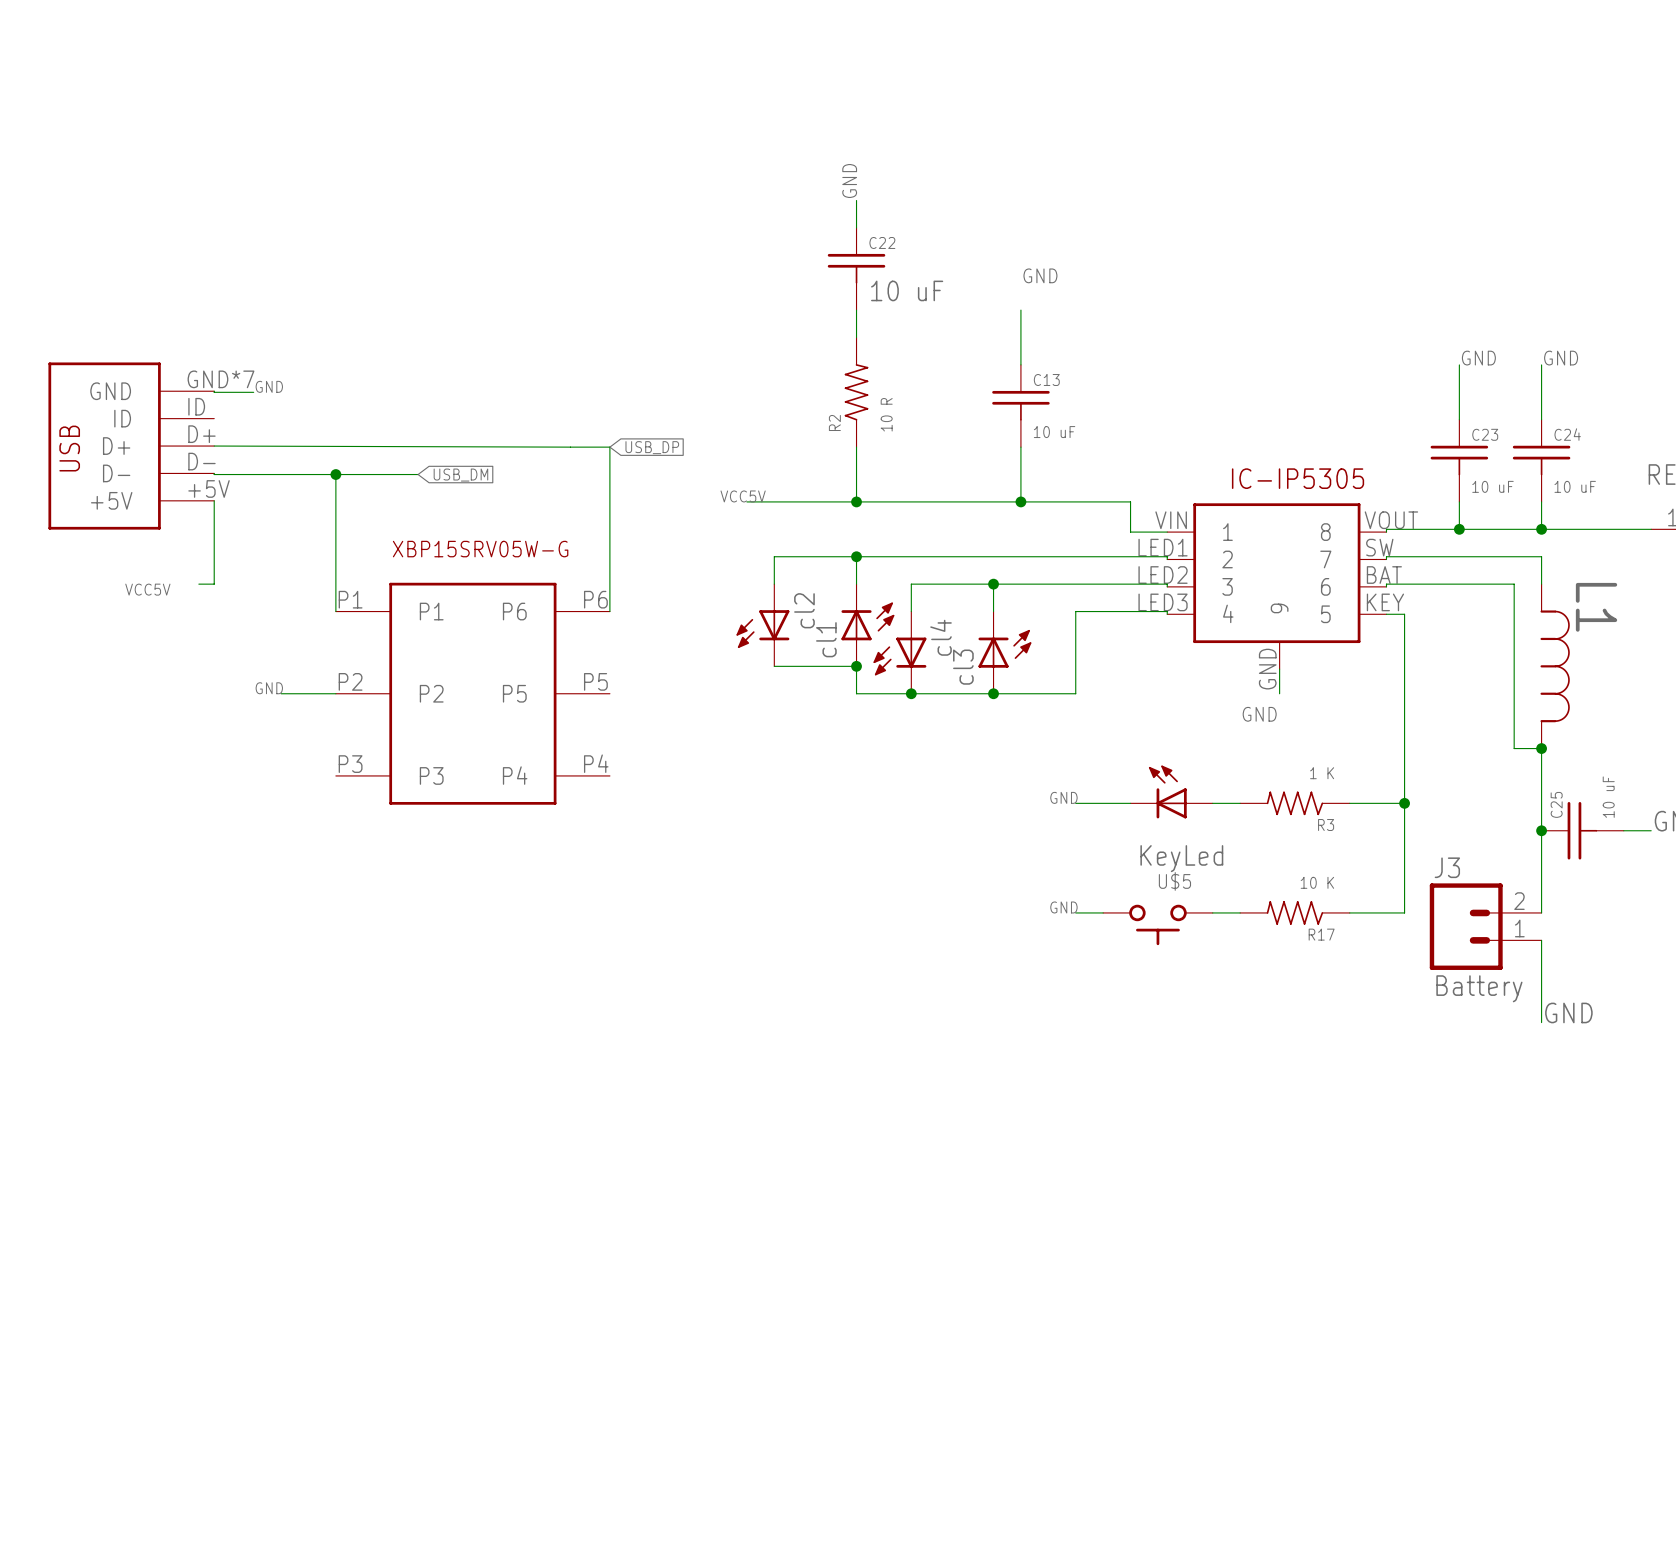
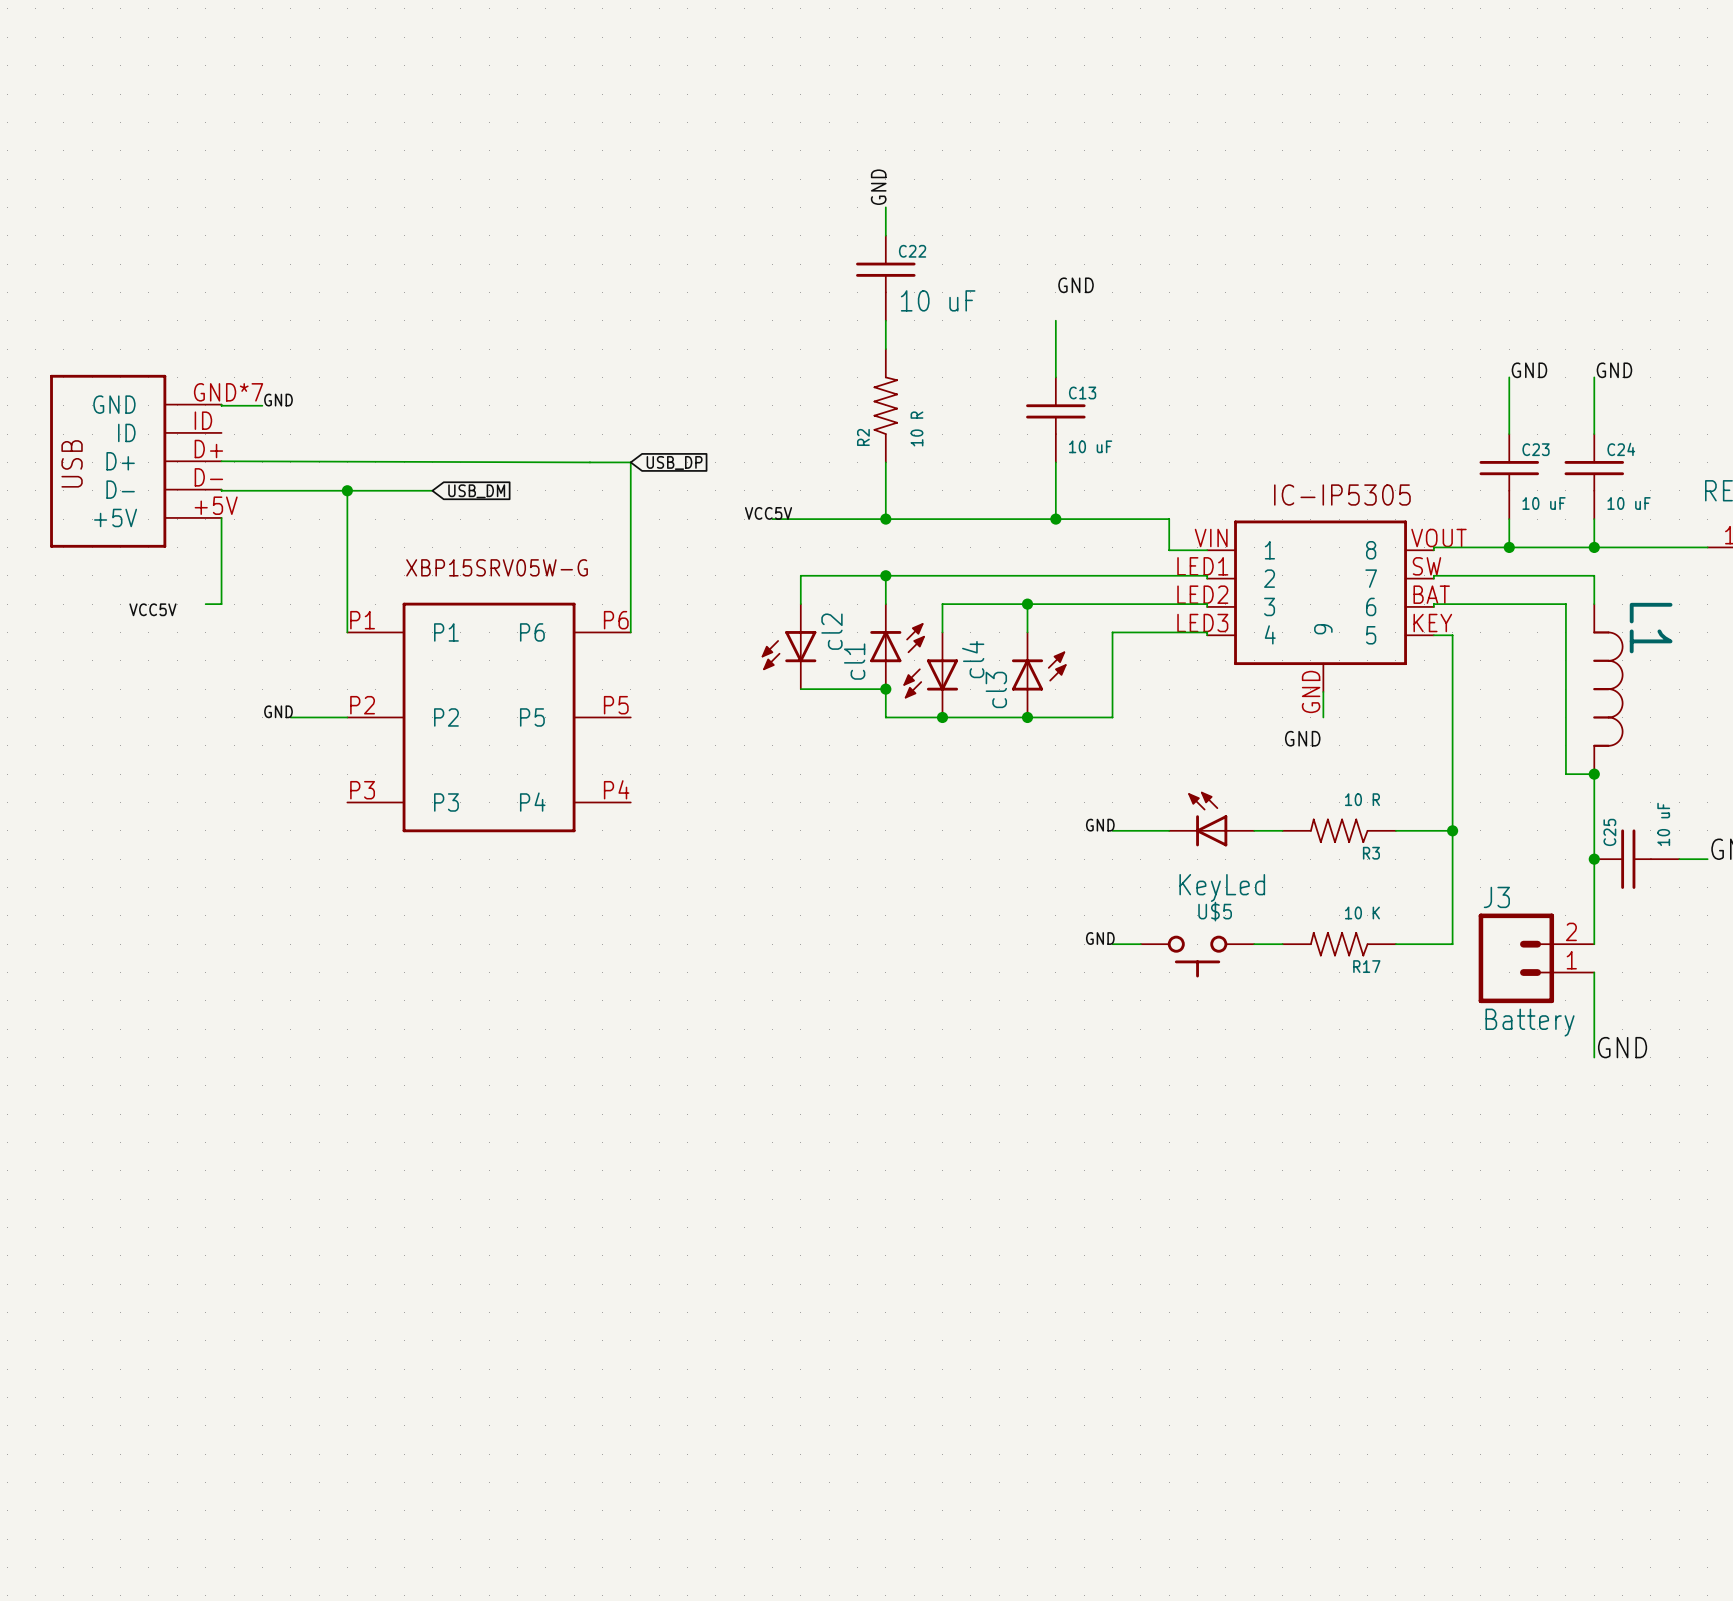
R3 value: 1 K (1322, 773) -> 10 R (1362, 799)

